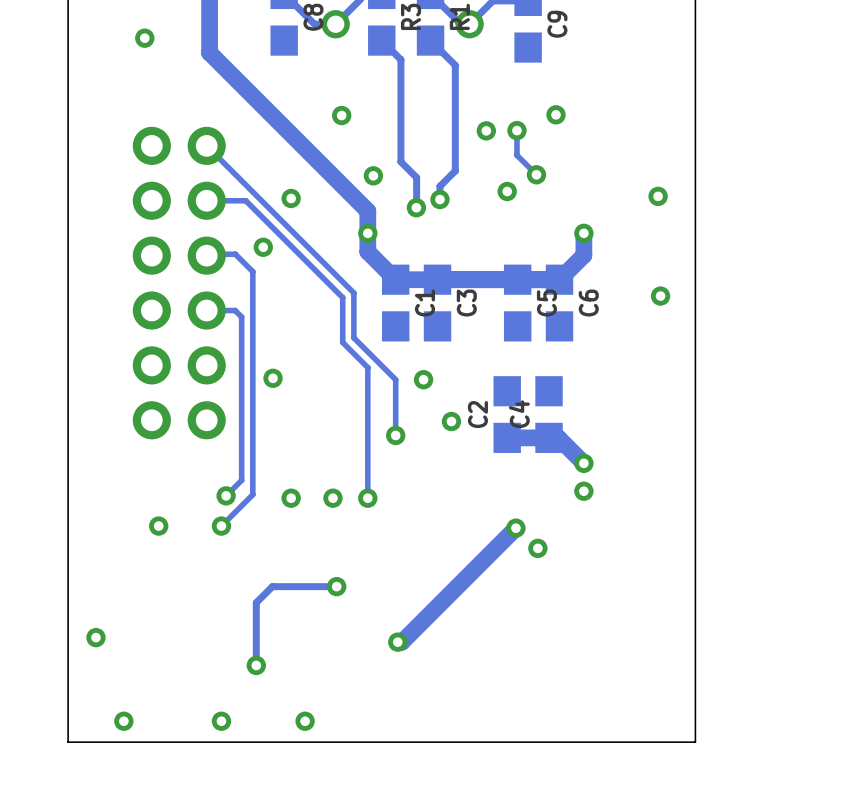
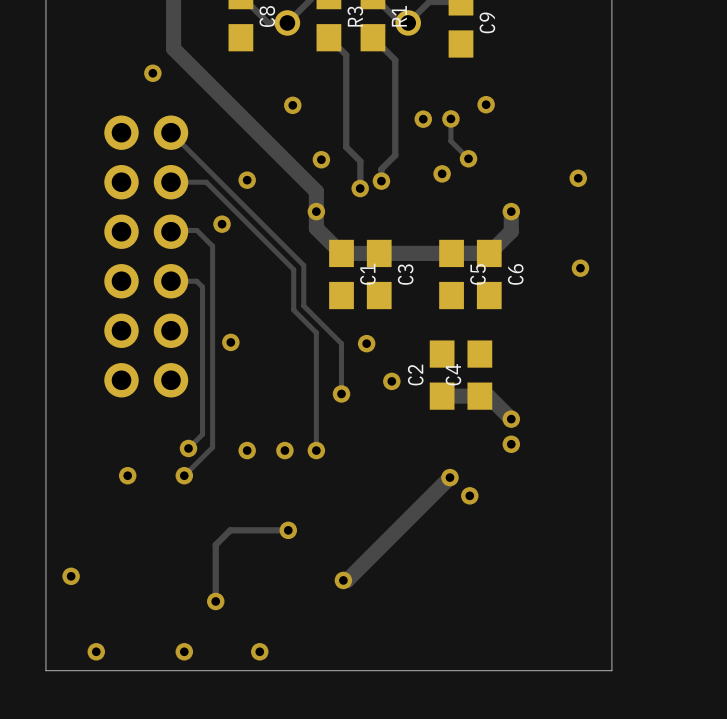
via: (144, 38) -> none
via: none -> (152, 73)

